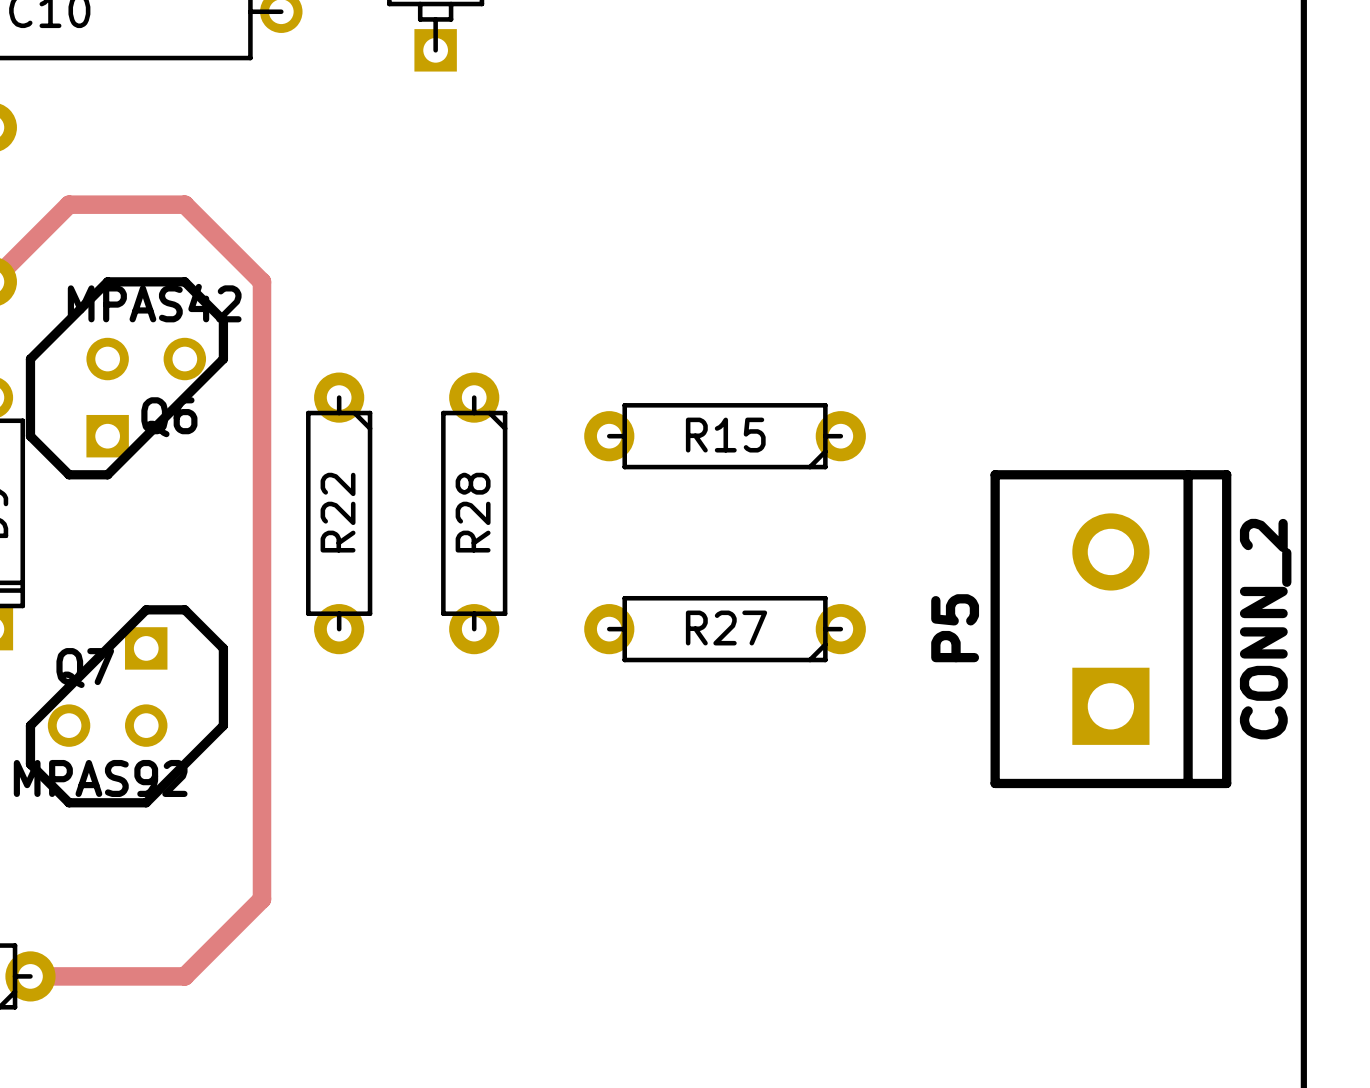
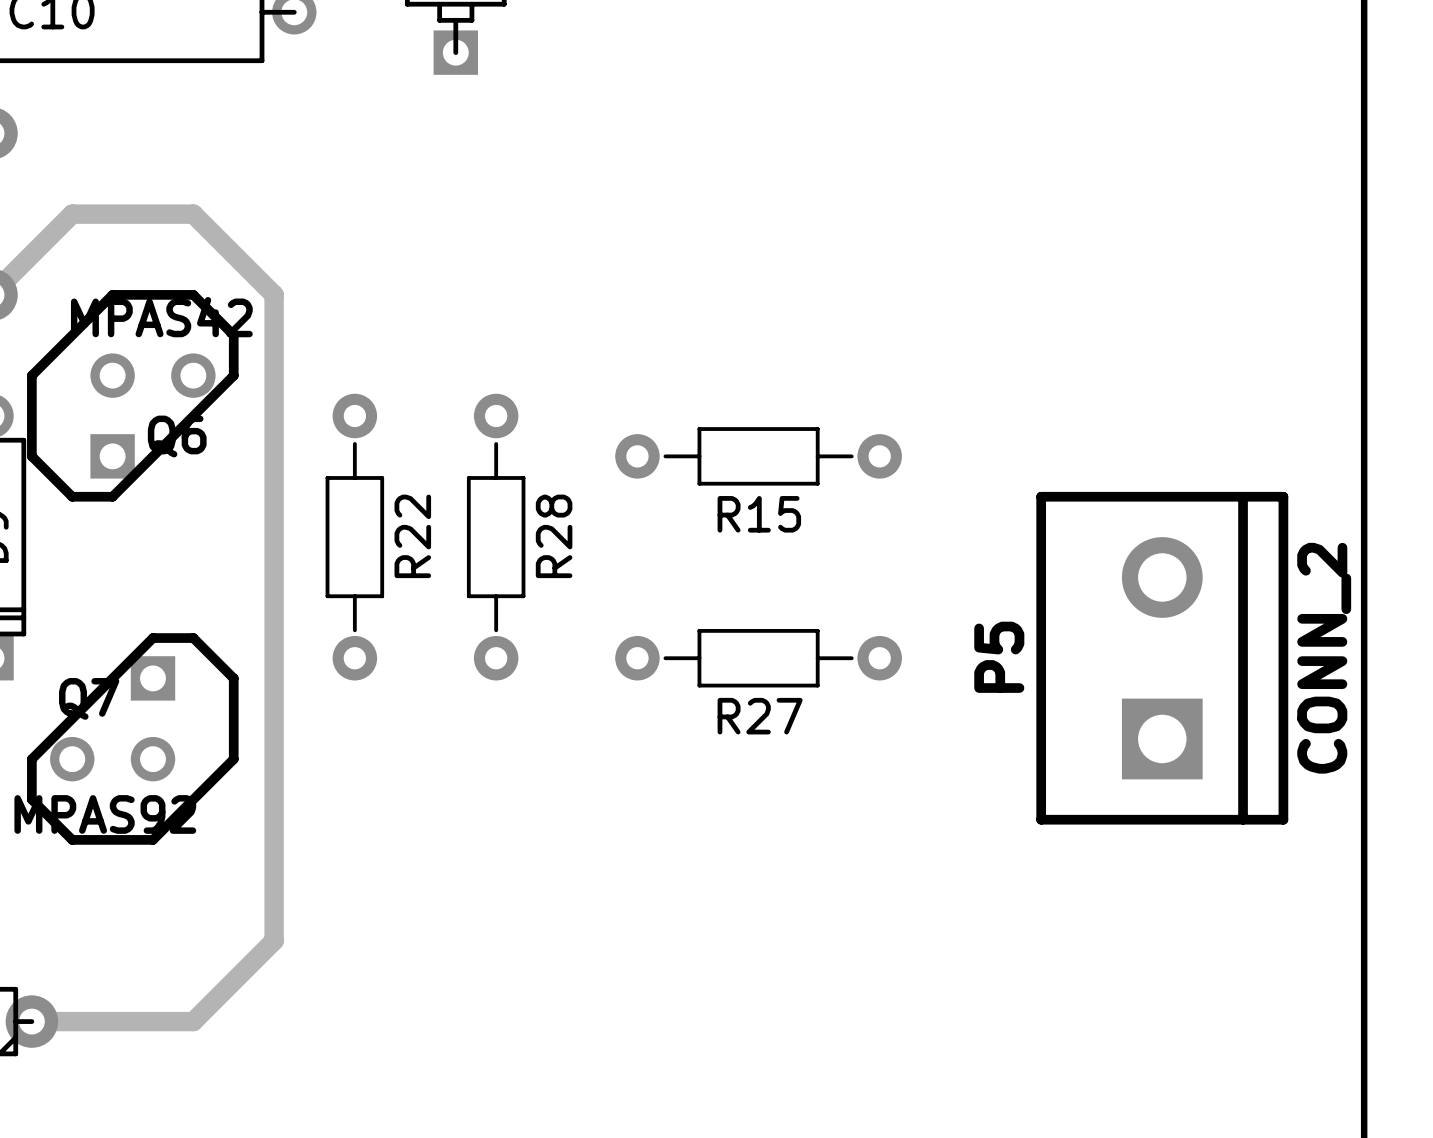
R22 footprint: [306, 372, 373, 655] -> [325, 393, 385, 681]
R28 footprint: [441, 372, 508, 655] -> [466, 393, 526, 681]
R15 footprint: [584, 403, 866, 470] -> [615, 427, 902, 486]
R27 footprint: [584, 595, 866, 663] -> [615, 628, 902, 688]

